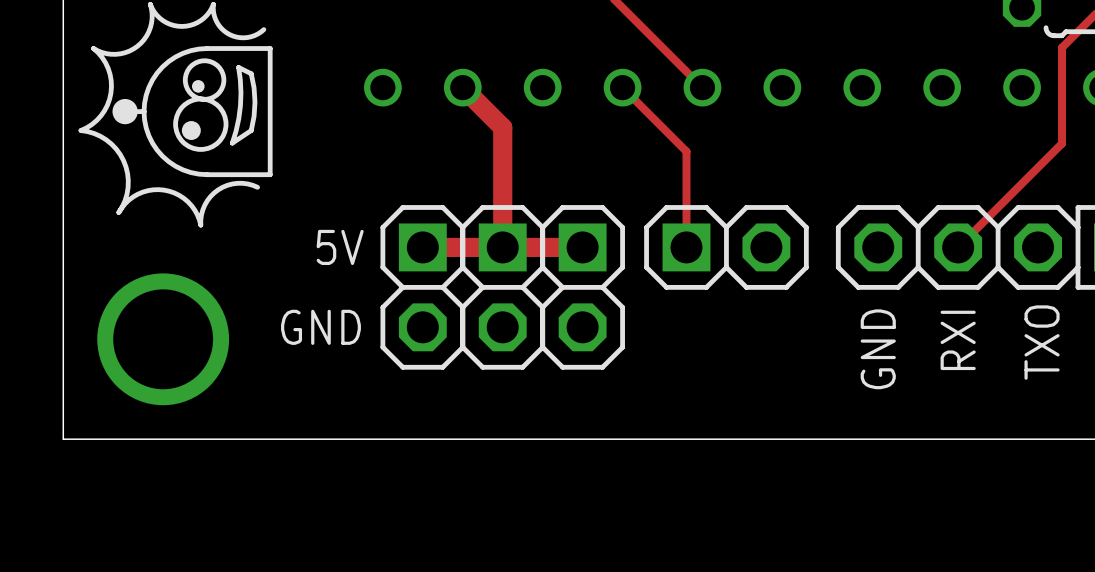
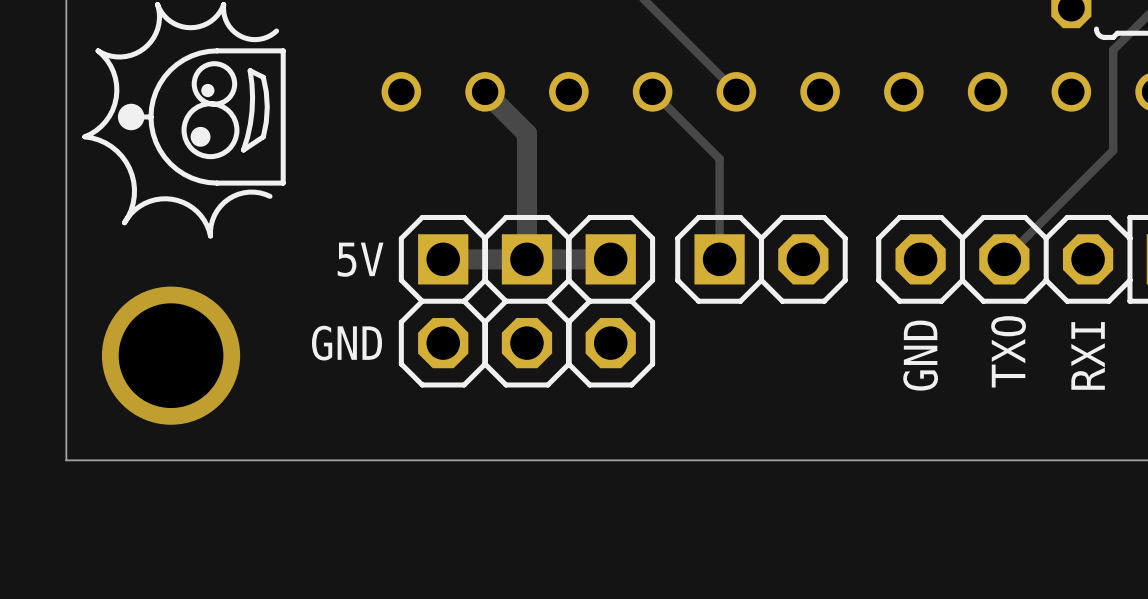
text: RXI (958, 340) -> TXO (1008, 351)
text: TXO (1042, 342) -> RXI (1088, 355)

